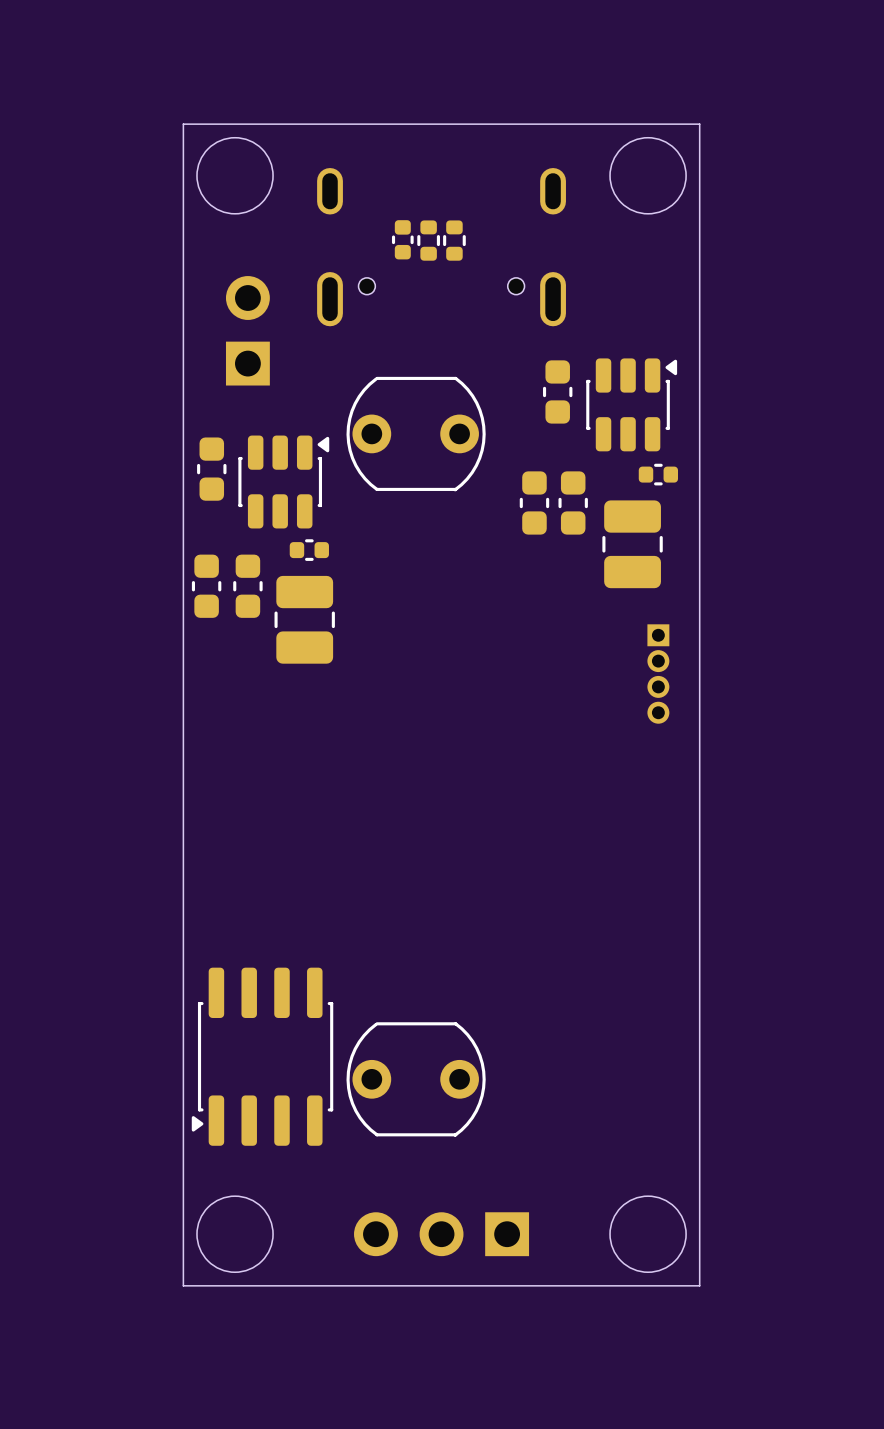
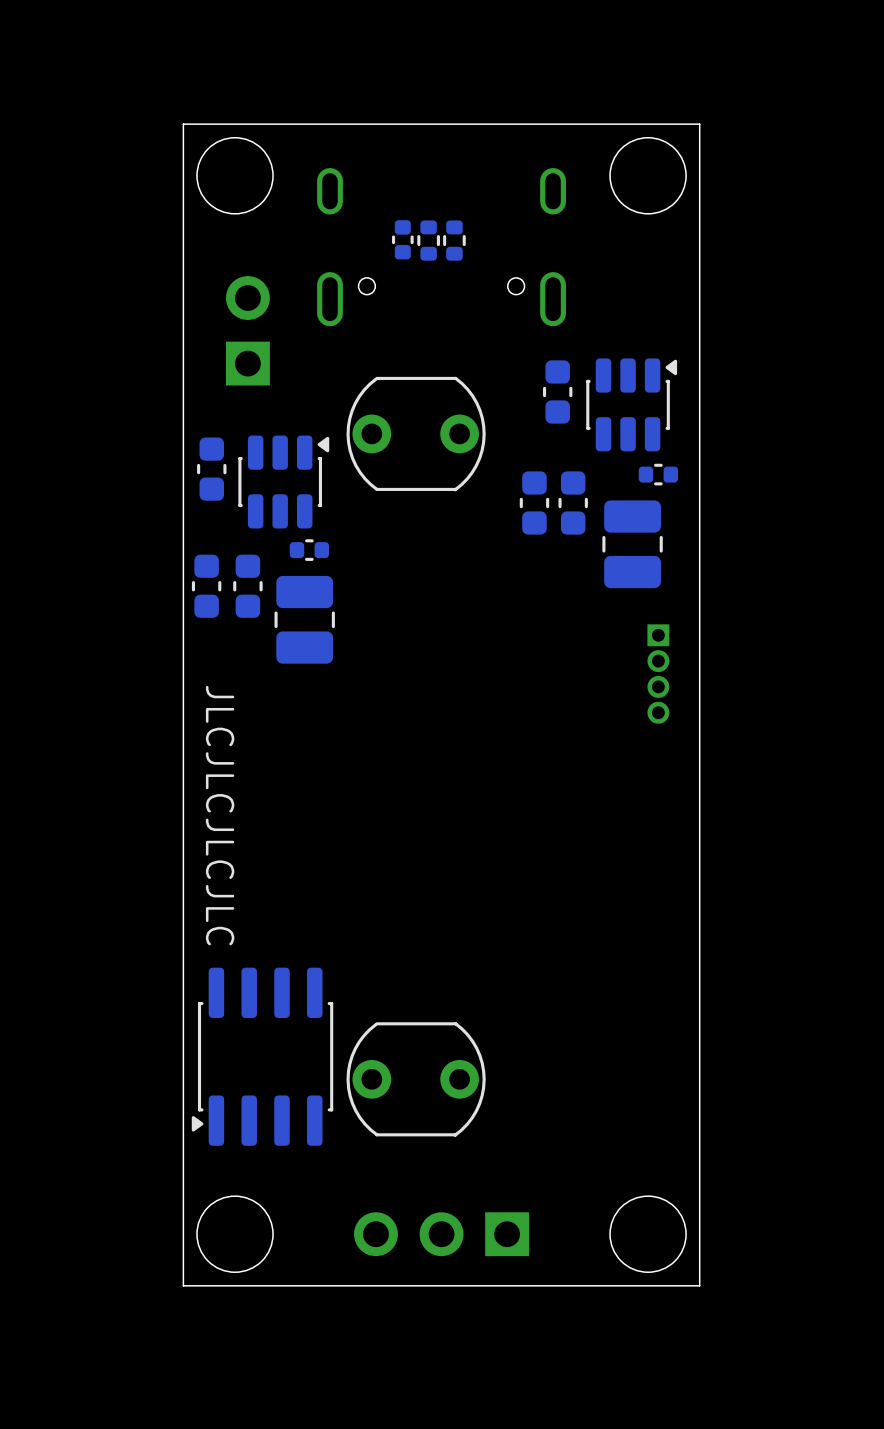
text: none -> JLCJLCJLCJLC (220, 815)

